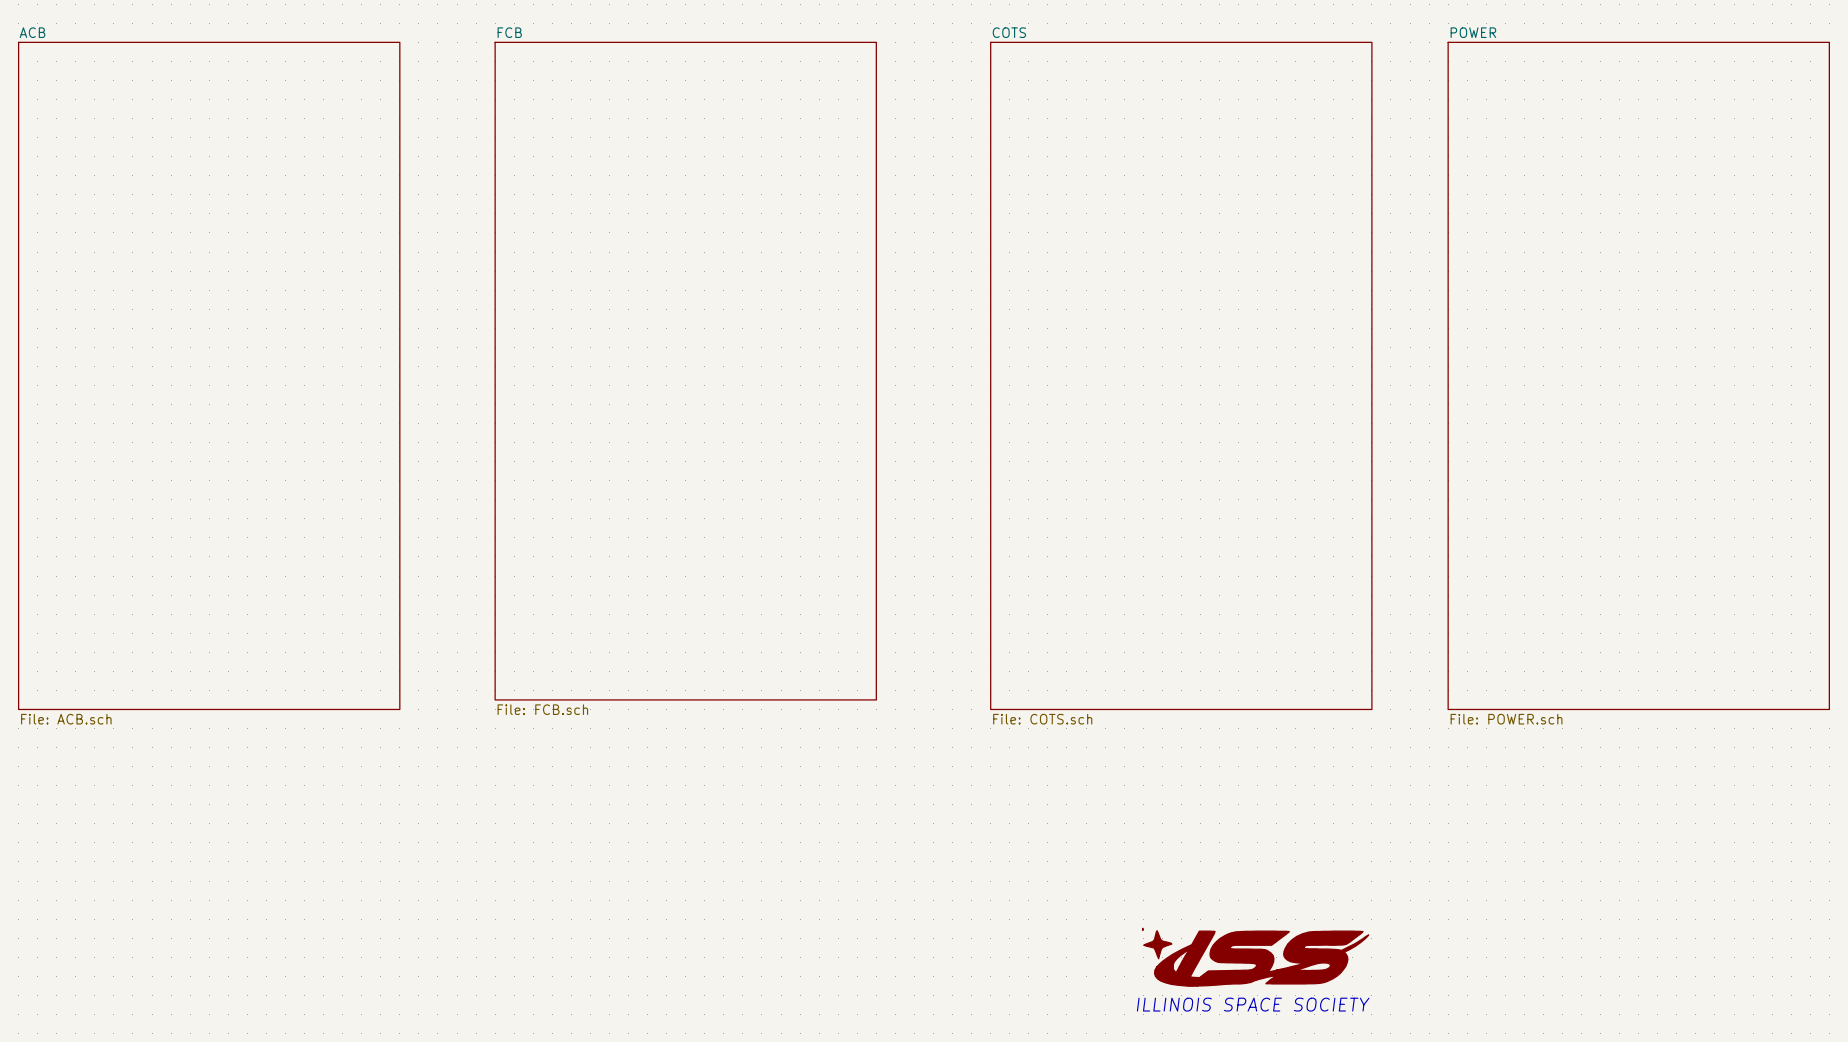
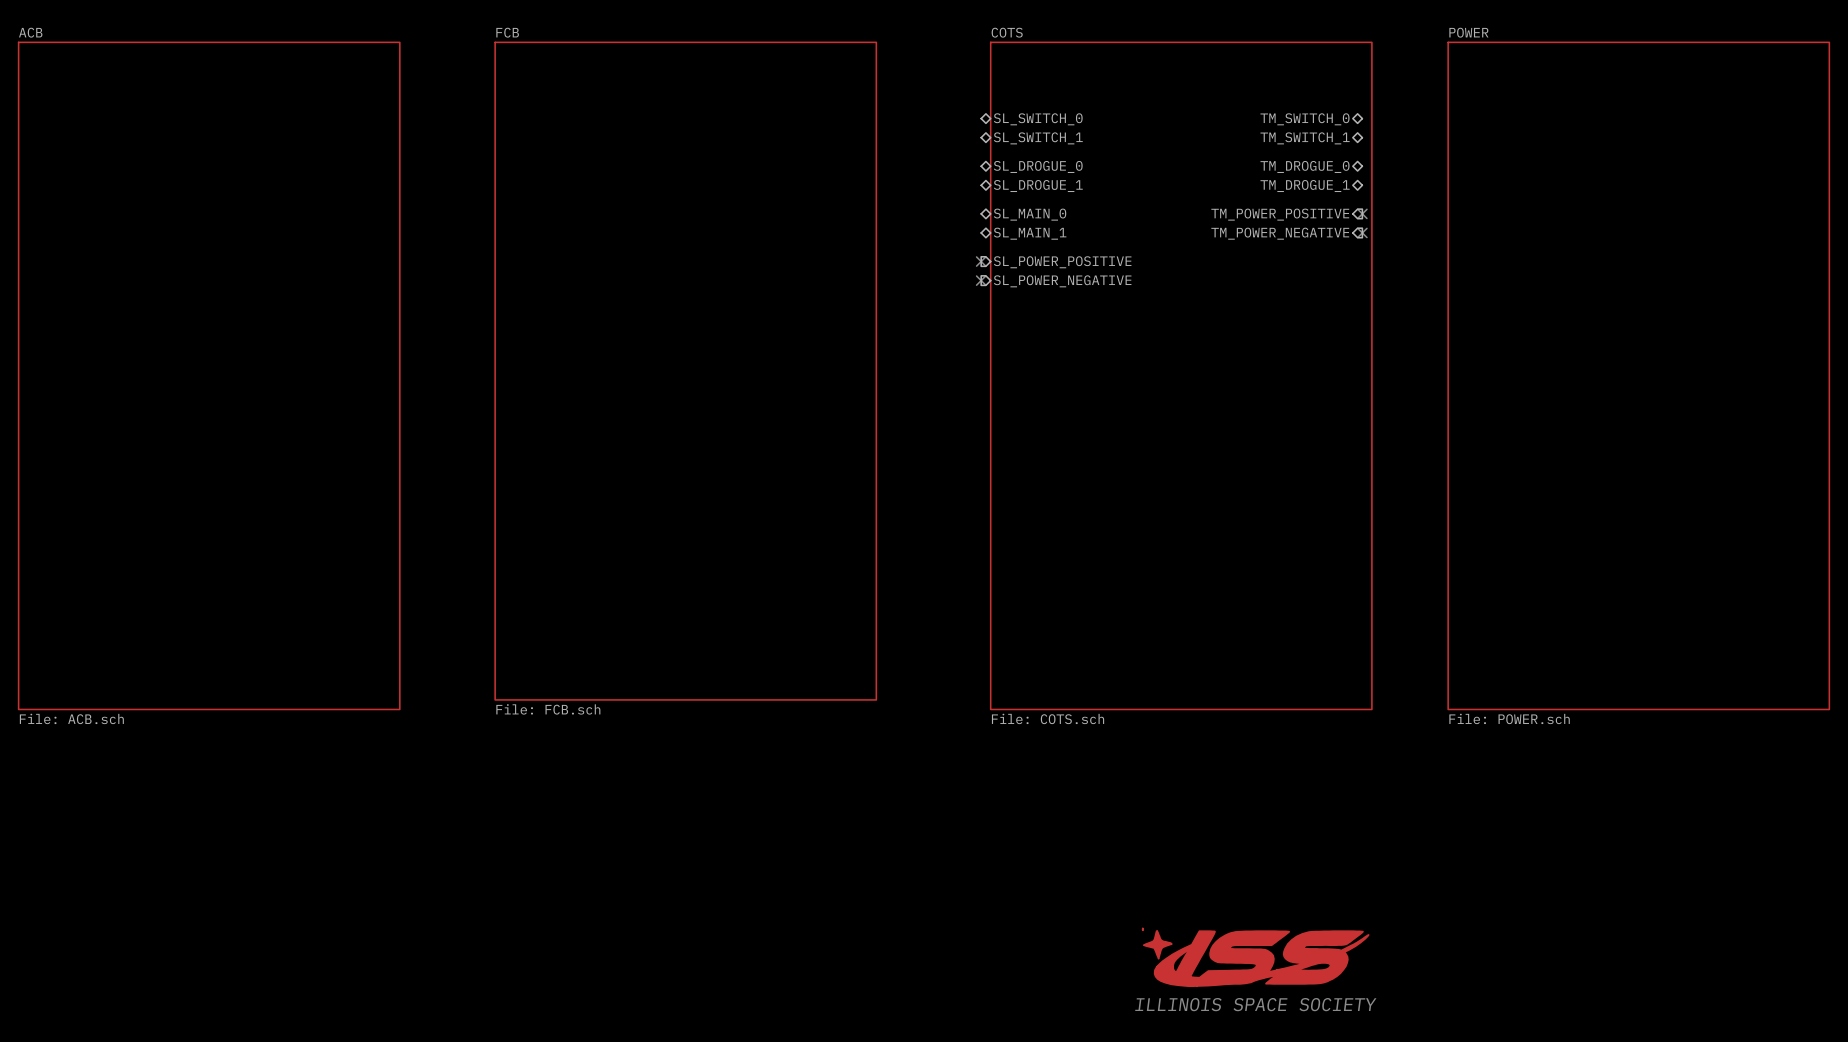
sheet pin: none -> SL_SWITCH_0 (1038, 119)
sheet pin: none -> TM_SWITCH_0 (1305, 119)
sheet pin: none -> SL_SWITCH_1 (1038, 138)
sheet pin: none -> TM_SWITCH_1 (1305, 138)
sheet pin: none -> SL_DROGUE_0 (1038, 166)
sheet pin: none -> TM_DROGUE_0 (1305, 166)
sheet pin: none -> SL_DROGUE_1 (1038, 186)
sheet pin: none -> TM_DROGUE_1 (1305, 186)
no-connect mark: none -> (1362, 213)
sheet pin: none -> SL_MAIN_0 (1030, 214)
sheet pin: none -> TM_POWER_POSITIVE (1280, 214)
no-connect mark: none -> (1362, 232)
sheet pin: none -> SL_MAIN_1 (1030, 233)
sheet pin: none -> TM_POWER_NEGATIVE (1280, 233)
no-connect mark: none -> (981, 261)
sheet pin: none -> SL_POWER_POSITIVE (1062, 262)
no-connect mark: none -> (981, 280)
sheet pin: none -> SL_POWER_NEGATIVE (1062, 281)

